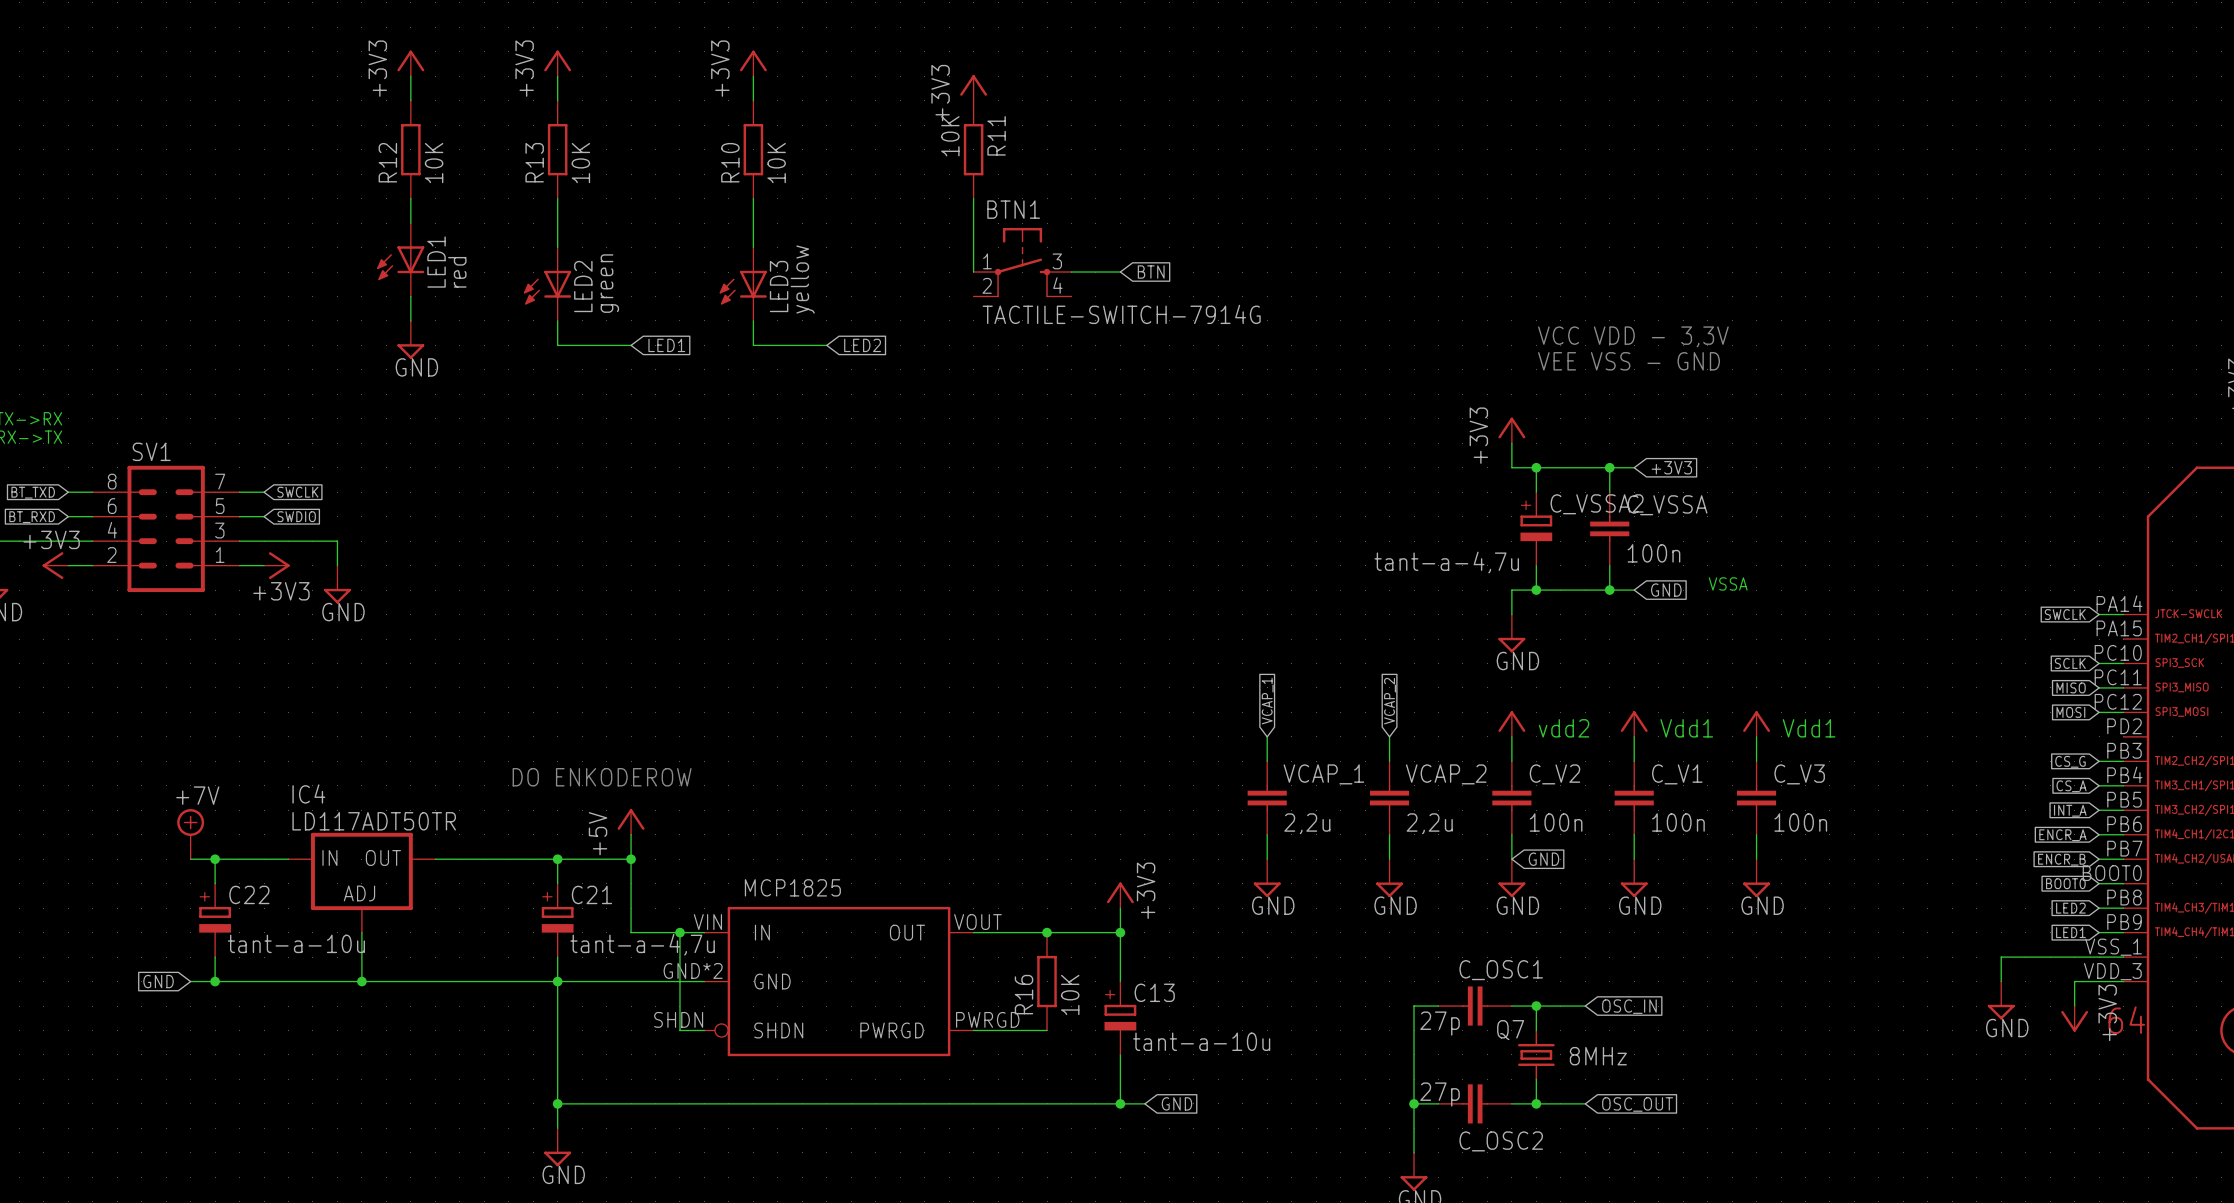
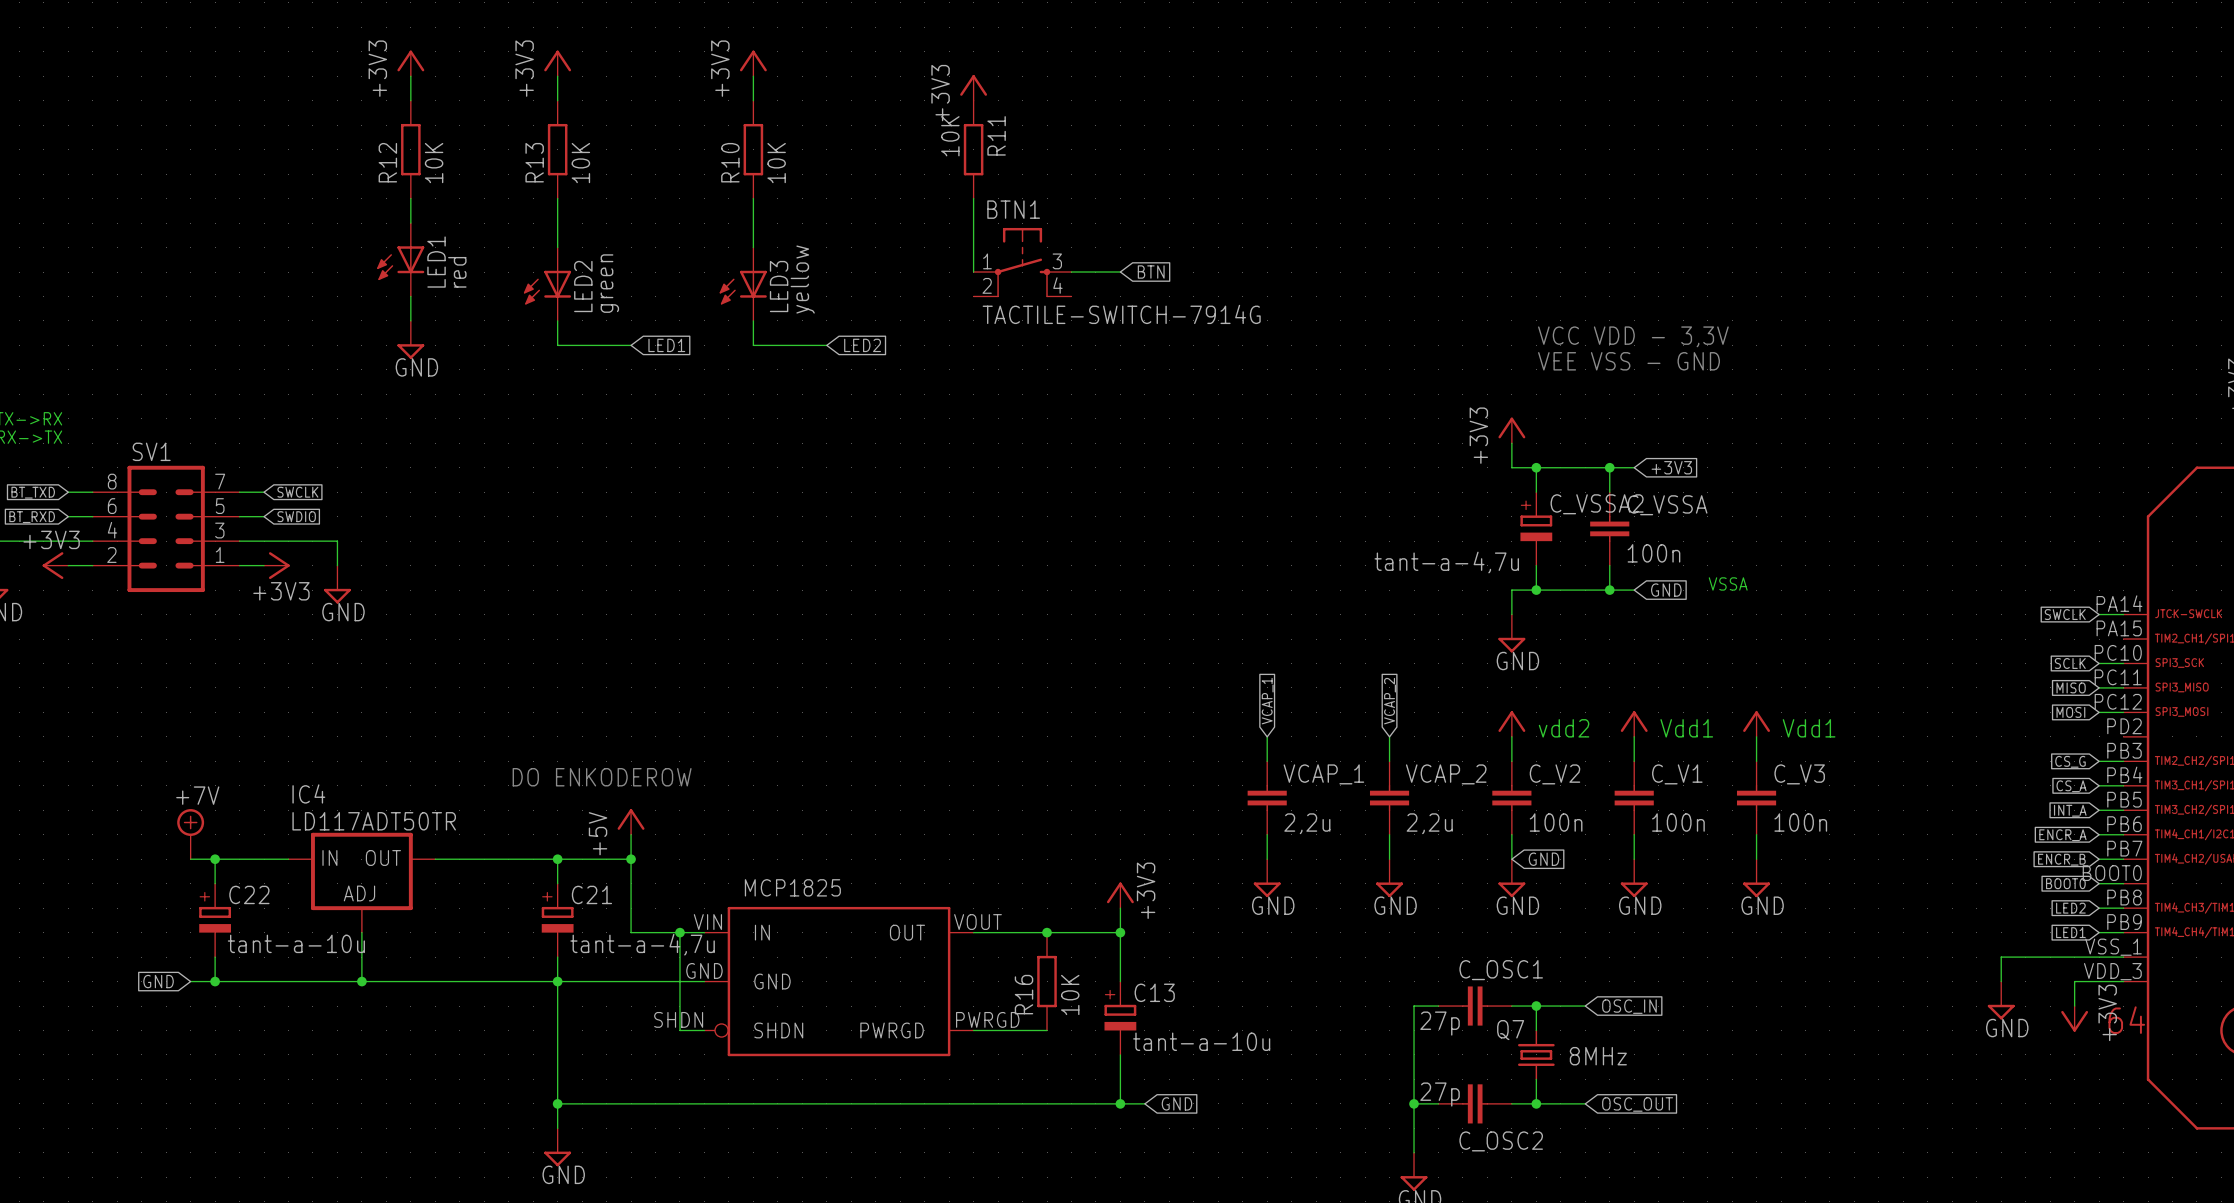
part pin number: GND*2 (693, 970) -> GND (704, 970)

